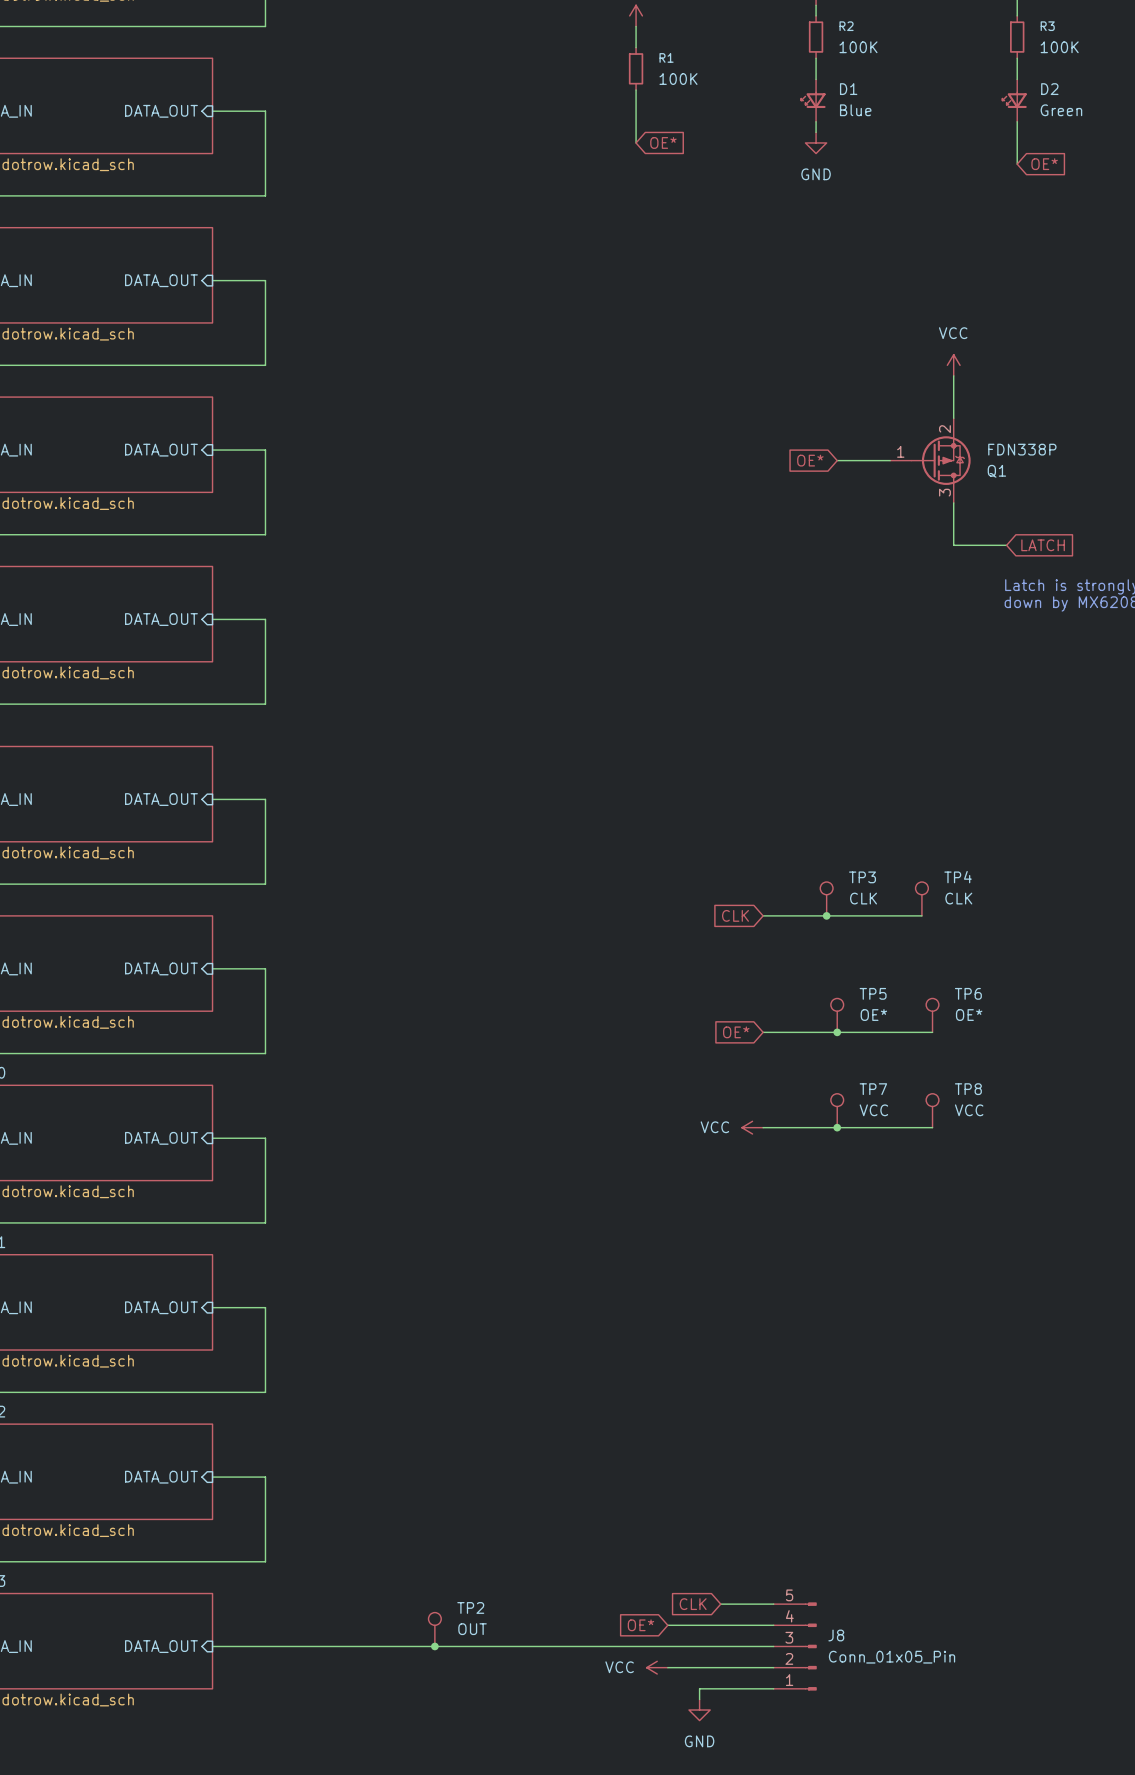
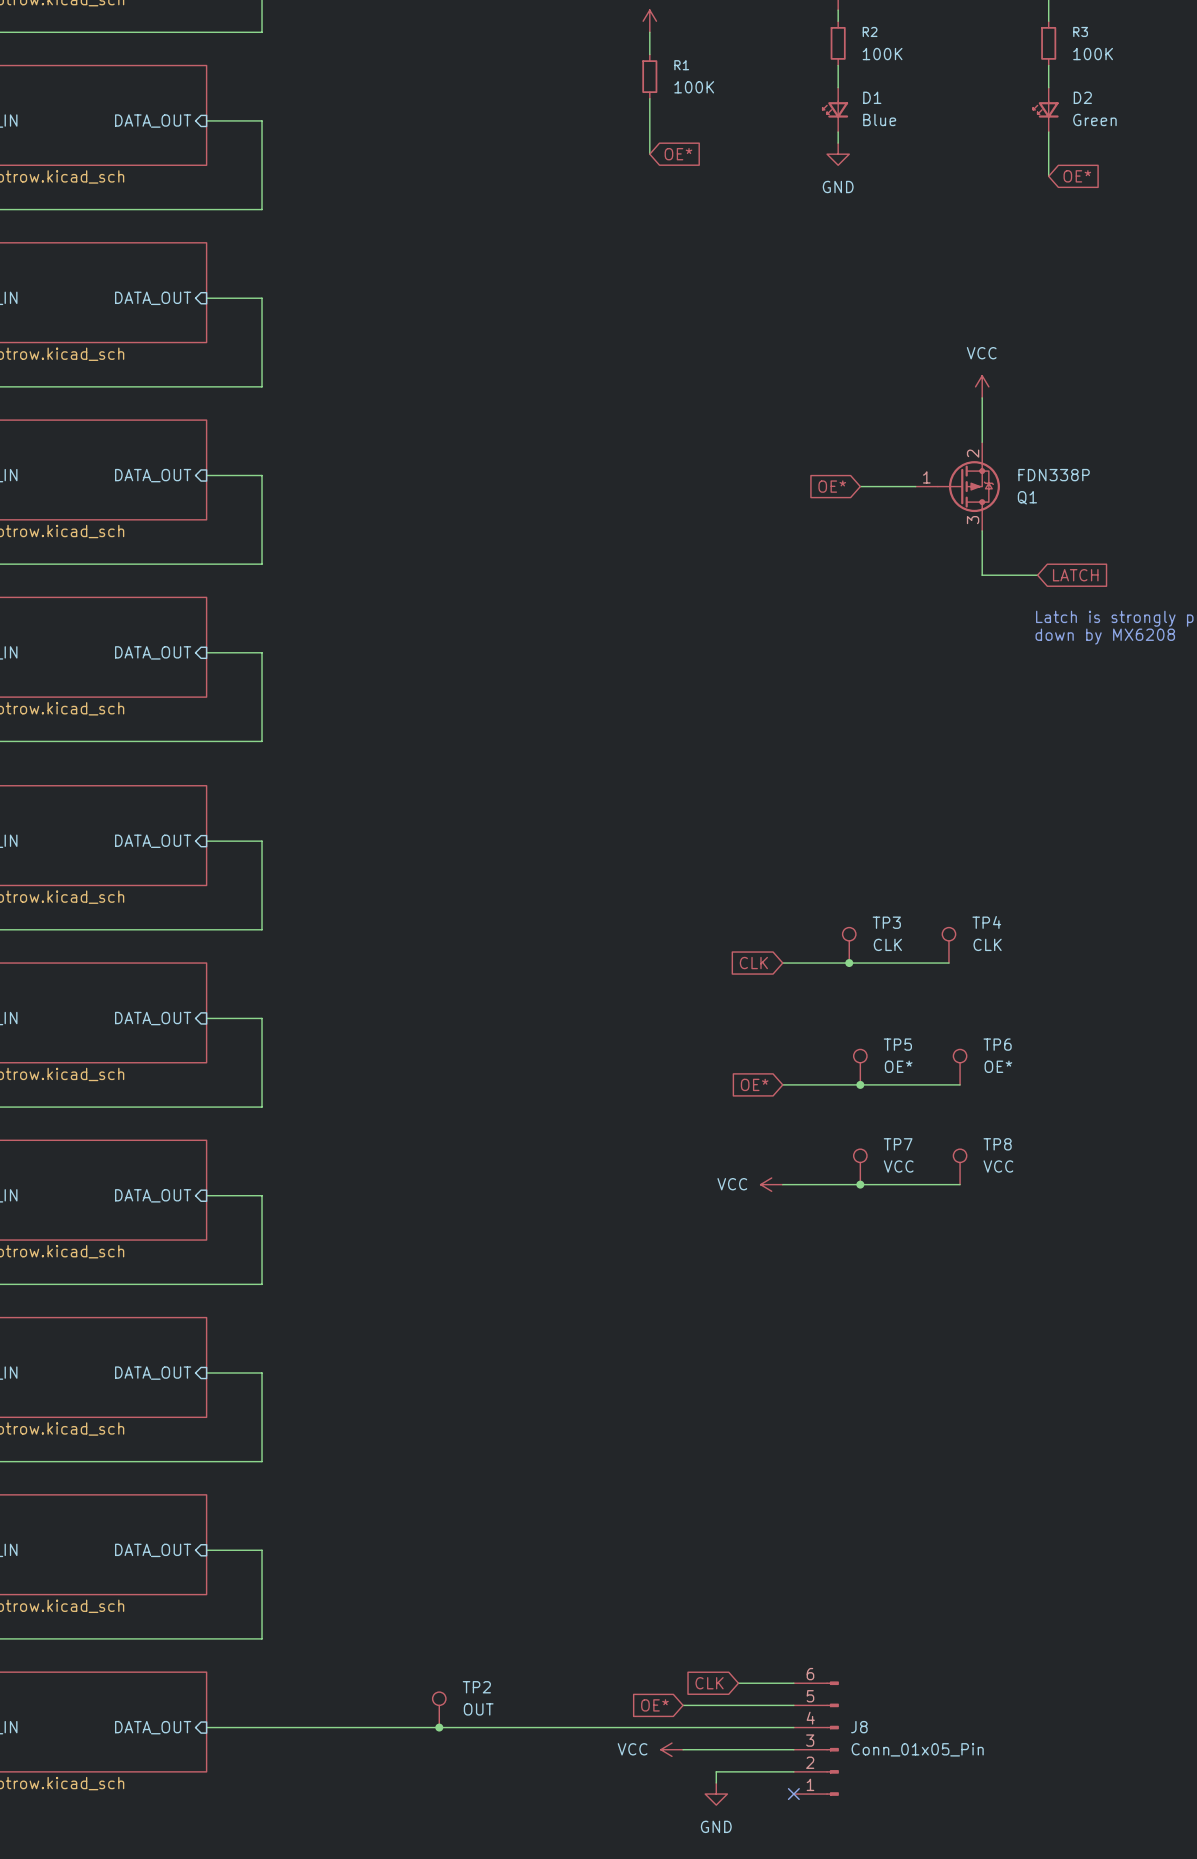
J8 symbol: [773, 1602, 817, 1691] -> [793, 1681, 839, 1796]
no-connect mark: none -> (793, 1794)

